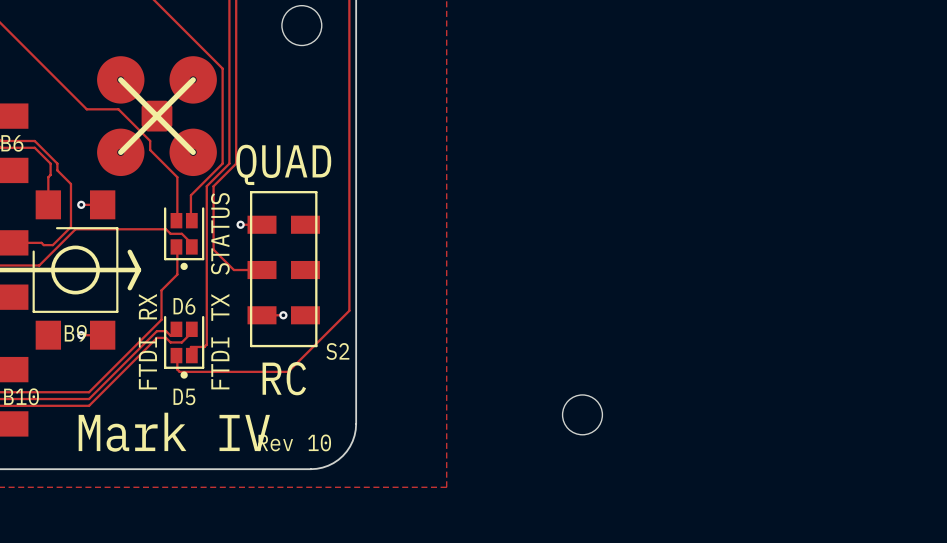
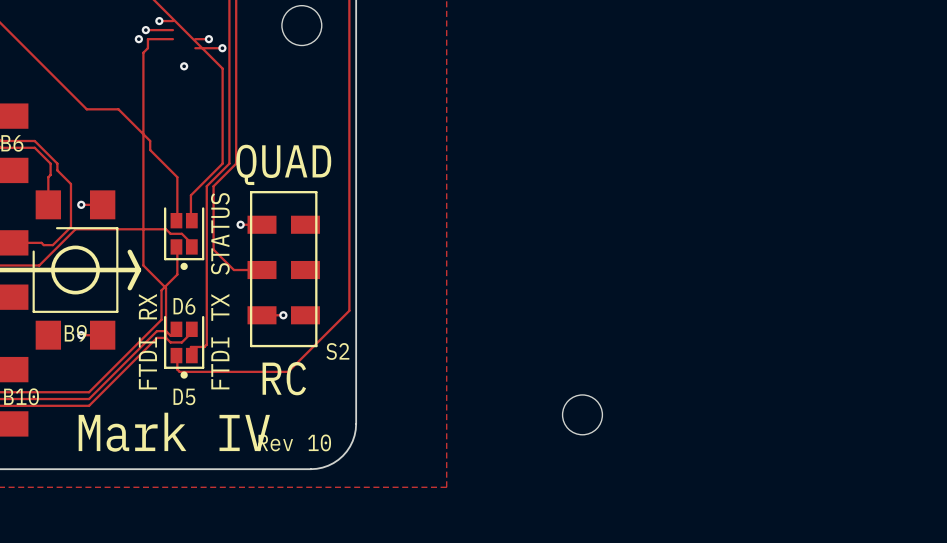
track: none -> (159, 21) (172, 21)
via: none -> (159, 21)
track: none -> (145, 30) (172, 30)
via: none -> (145, 30)
via: none -> (138, 39)
track: none -> (172, 39) (147, 39) (147, 48) (143, 52) (143, 265) (166, 288) (166, 337)
track: none -> (195, 39) (208, 39)
via: none -> (208, 39)
track: none -> (195, 48) (222, 48)
via: none -> (222, 48)
drawing: [97, 56, 217, 177] -> none
via: none -> (184, 66)

